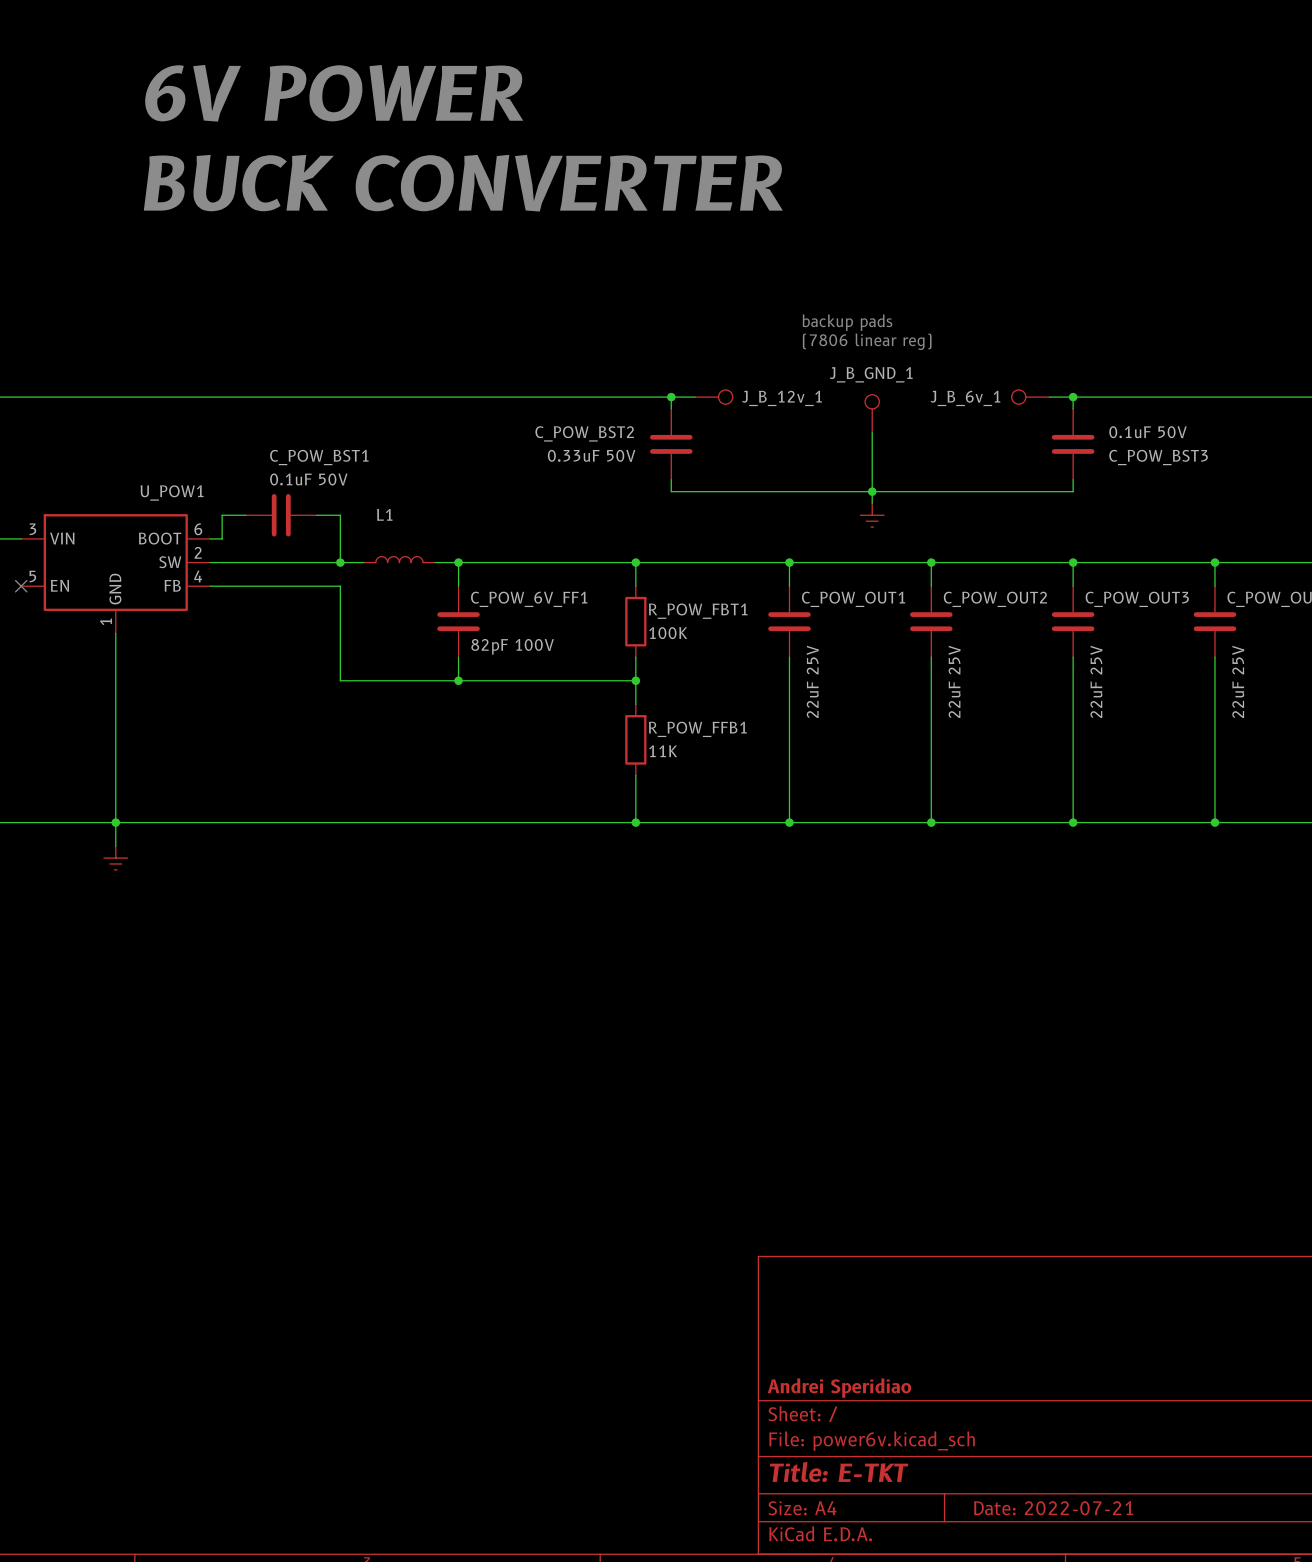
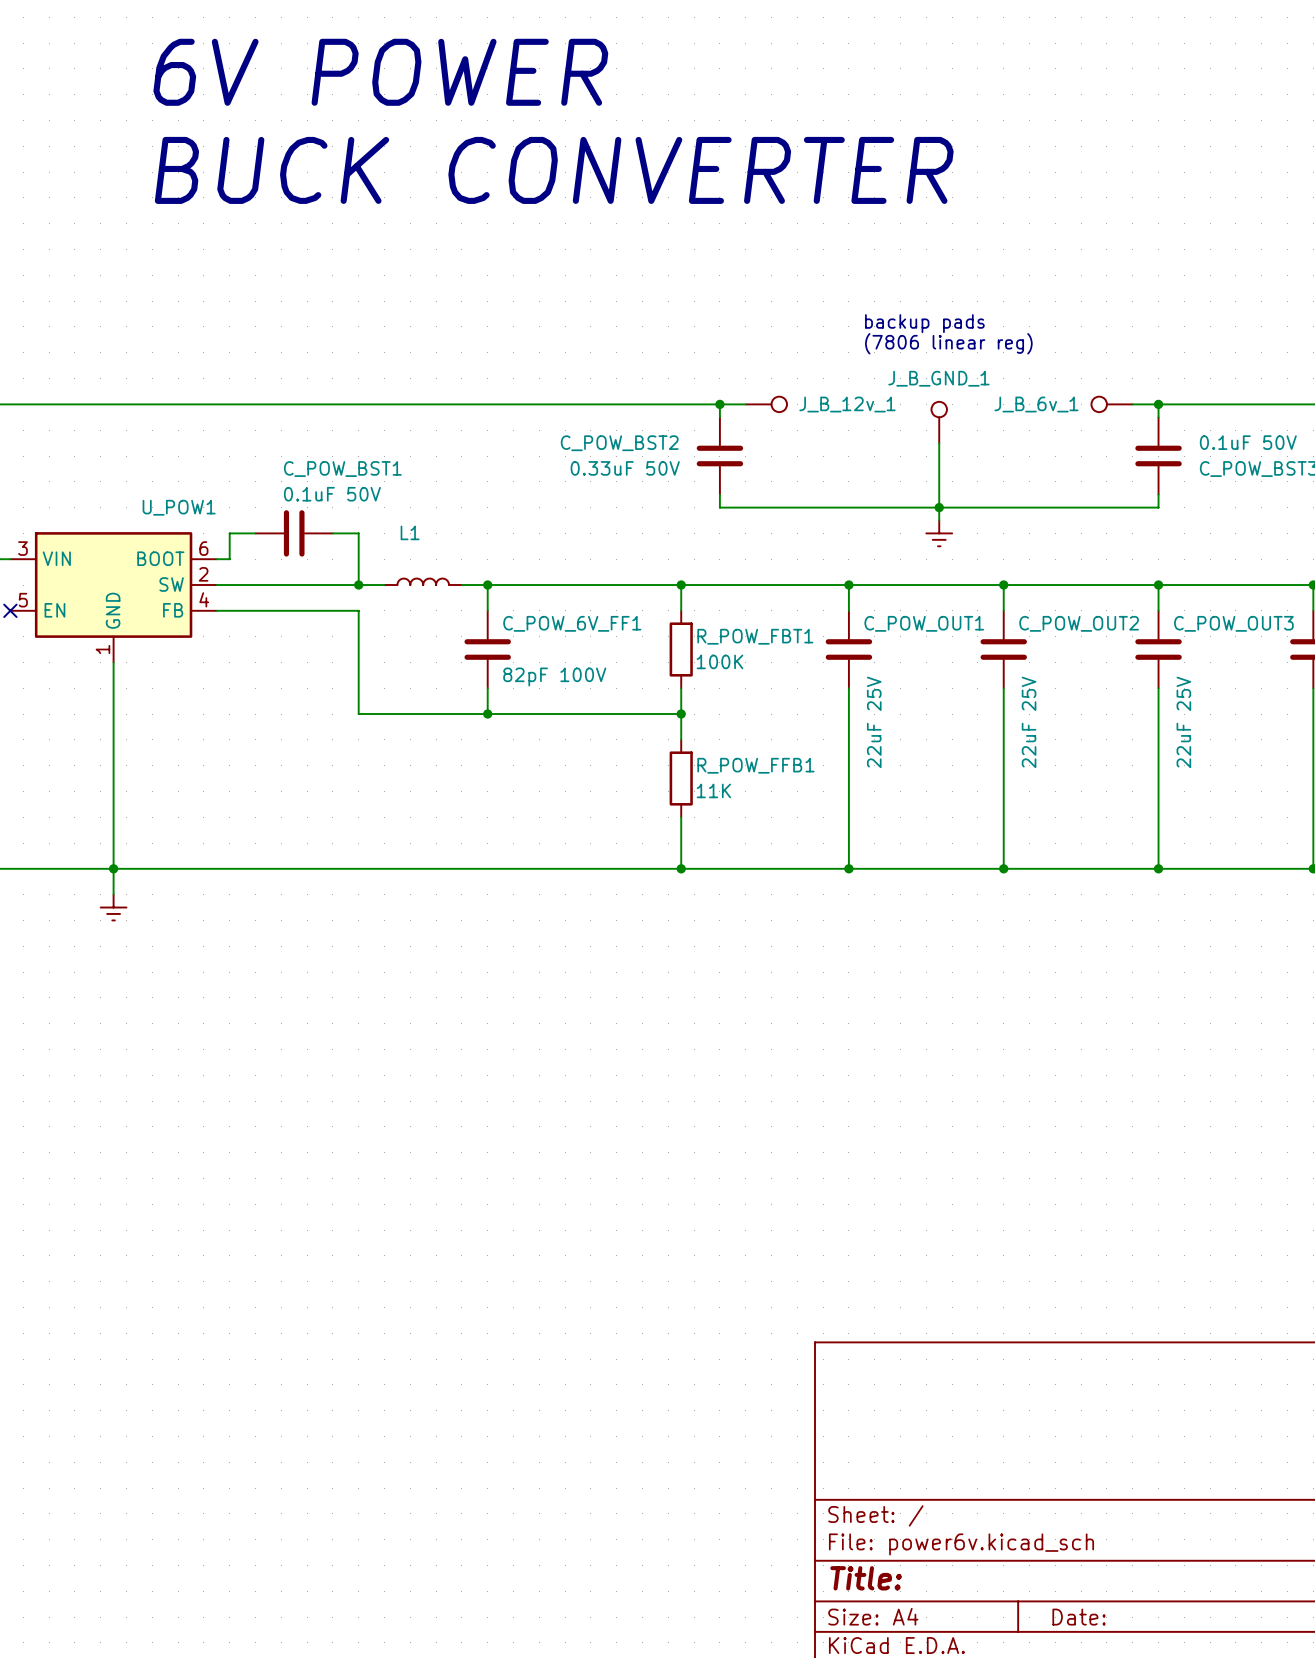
title block: Andrei Speridiao (839, 1388) -> none
title block: Title: E-TKT (839, 1472) -> Title: (866, 1578)
title block: Date: 2022-07-21 (1053, 1508) -> Date: (1079, 1617)

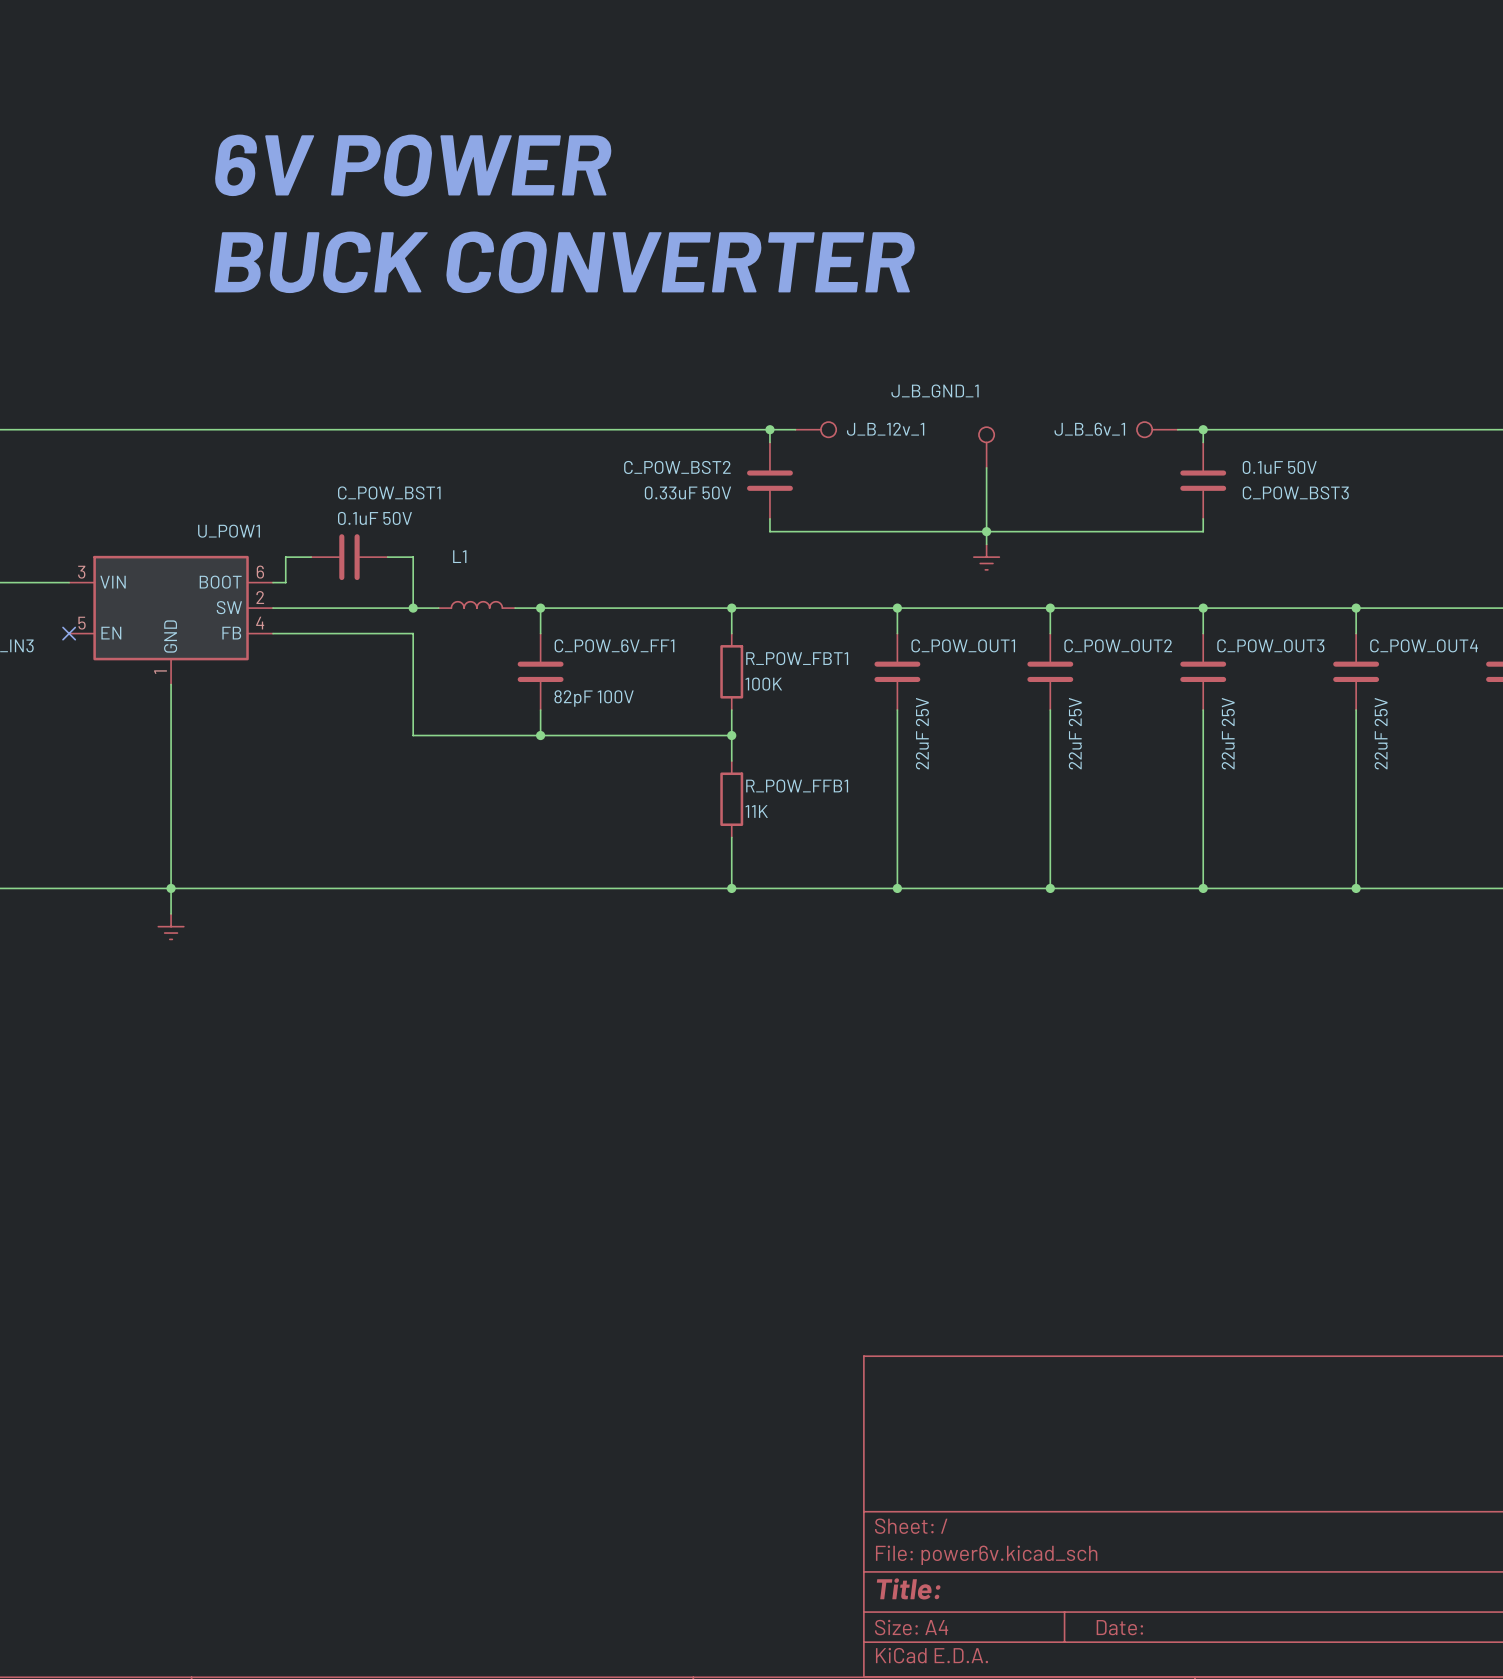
text position: 6V POWER (380, 72) -> 6V POWER (413, 165)
text position: BUCK CONVERTER (554, 170) -> BUCK CONVERTER (564, 262)
text: backup pads (924, 323) -> none
text: (7806 linear reg) (948, 343) -> none
J_B_GND_1 name position: J_B_GND_1 (938, 378) -> J_B_GND_1 (935, 390)

